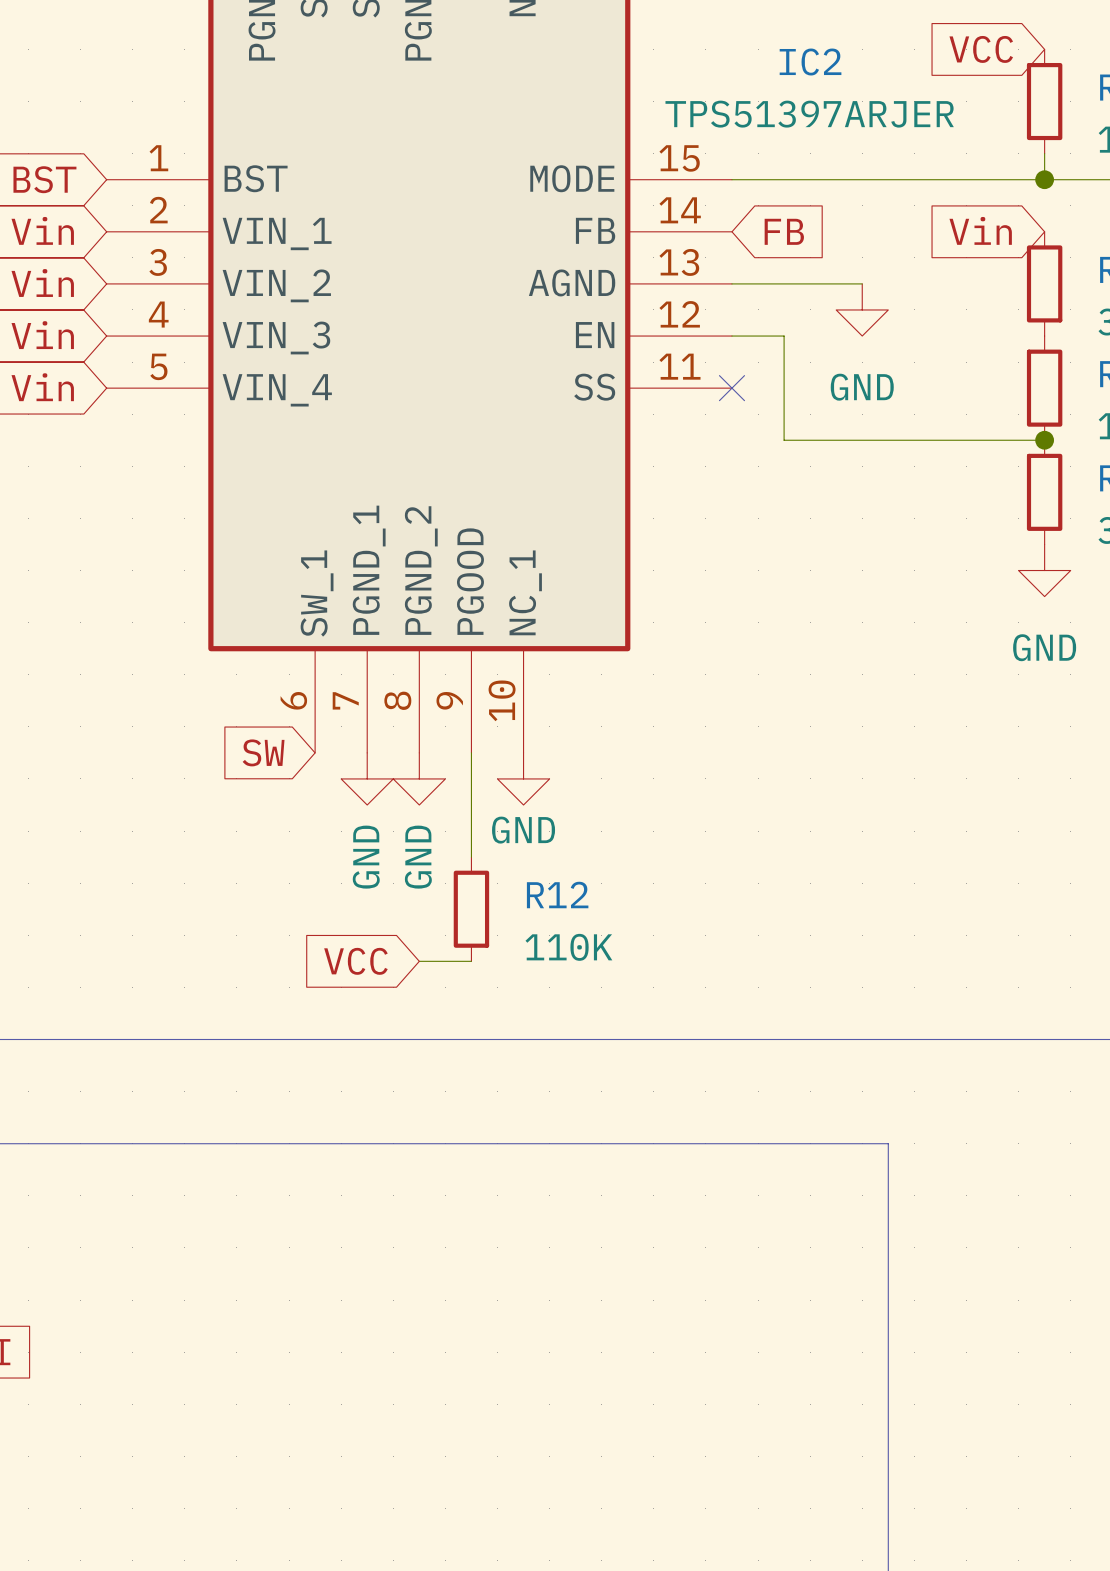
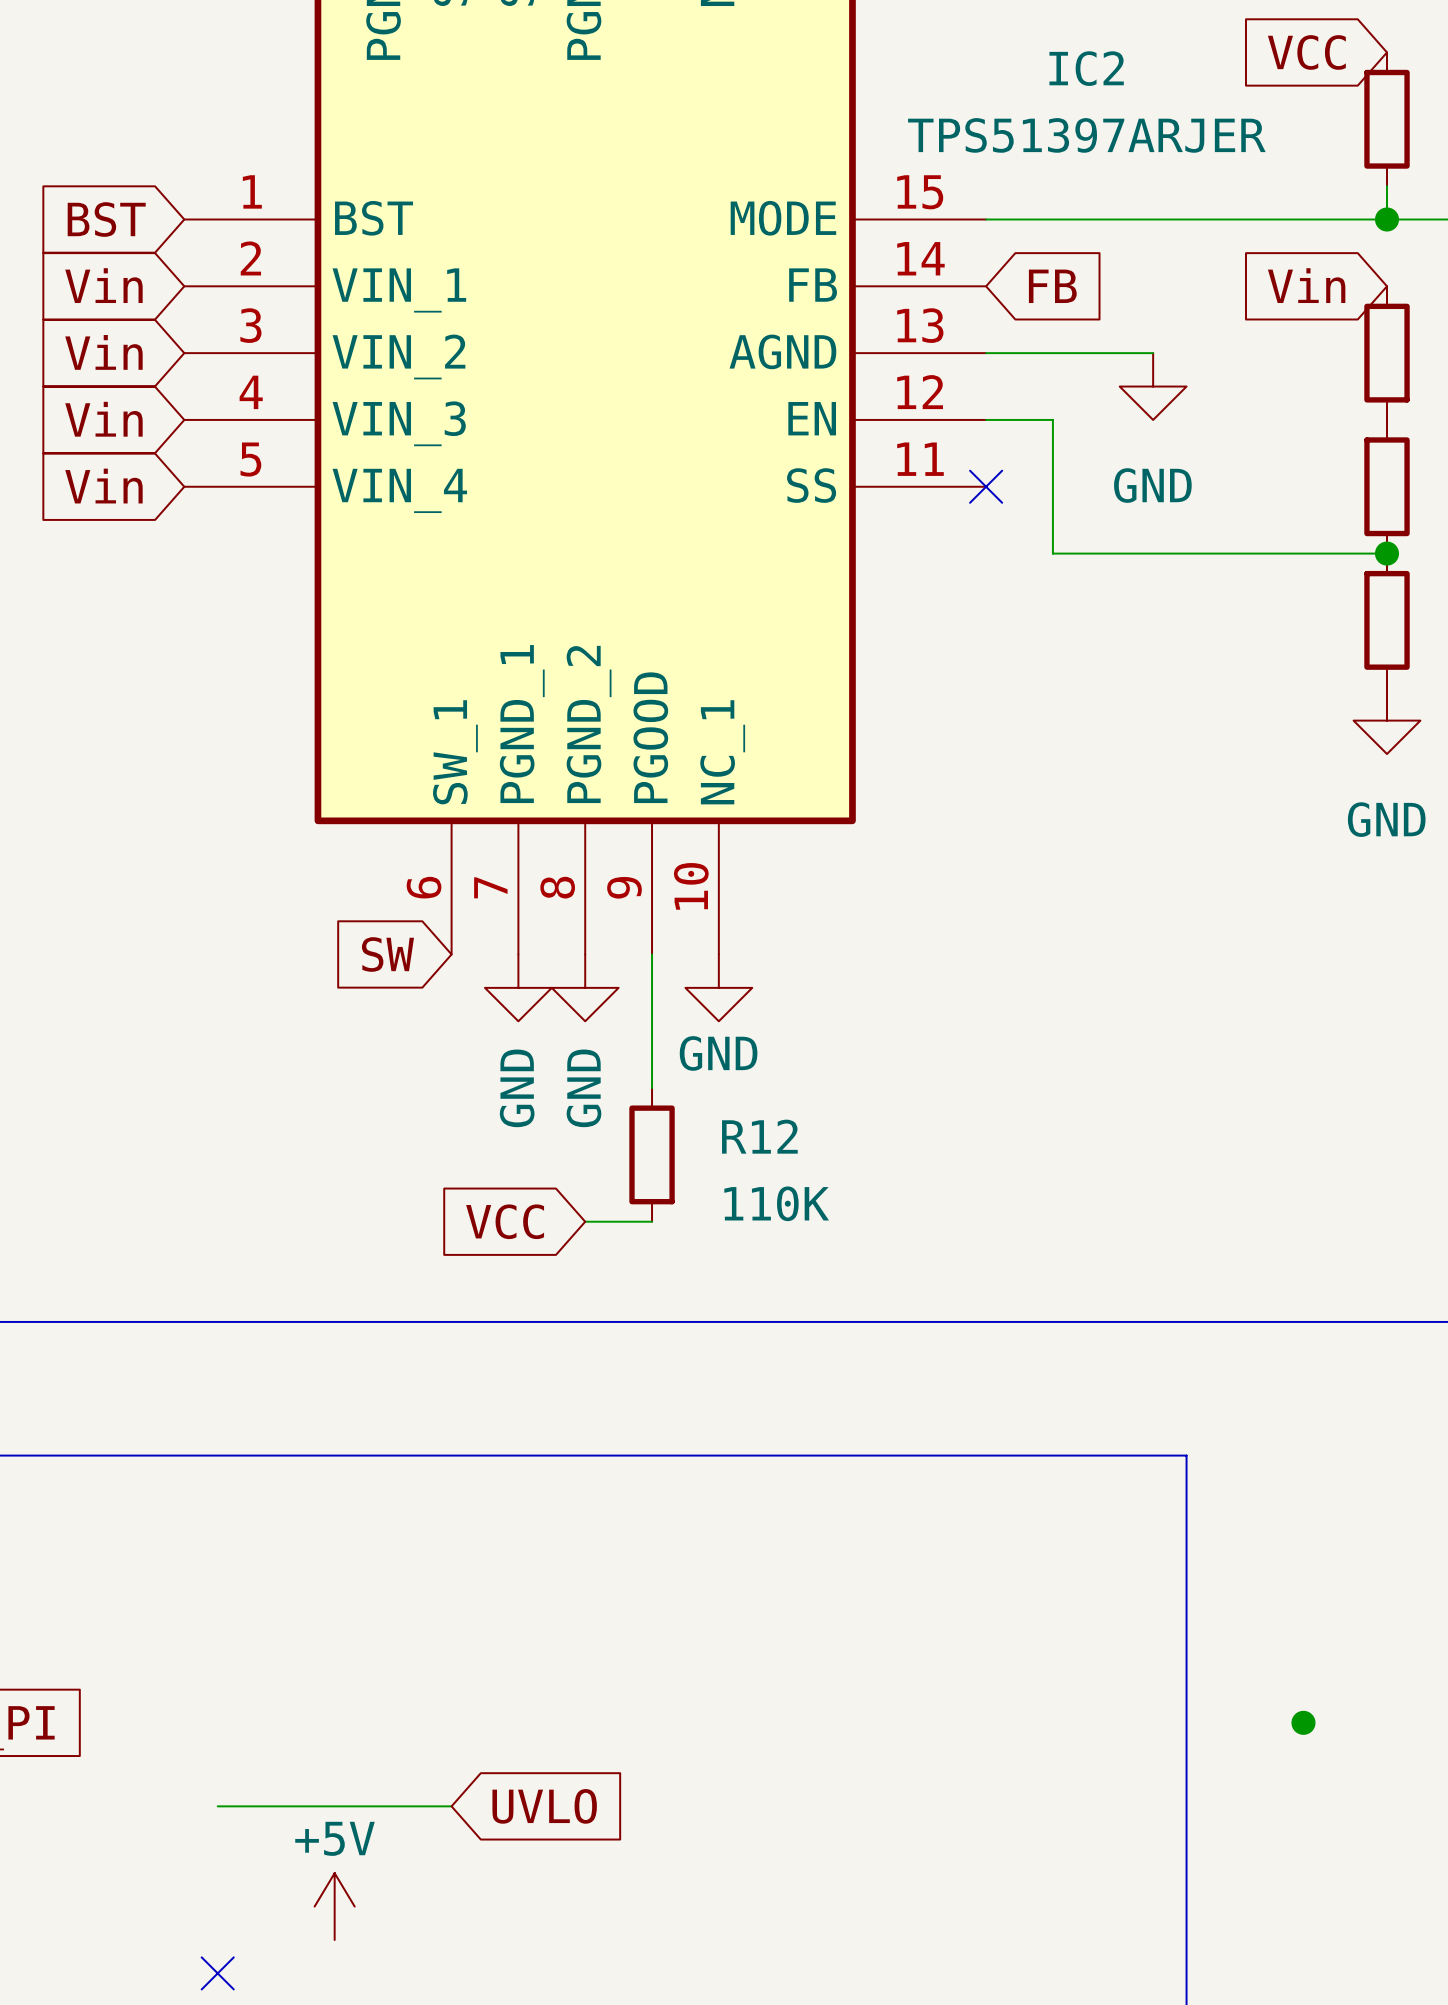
junction: none -> (1303, 1722)
wire: none -> (217, 1806) (451, 1806)
global label: none -> UVLO (544, 1806)
power symbol: none -> +5V (334, 1906)
no-connect mark: none -> (217, 1973)

